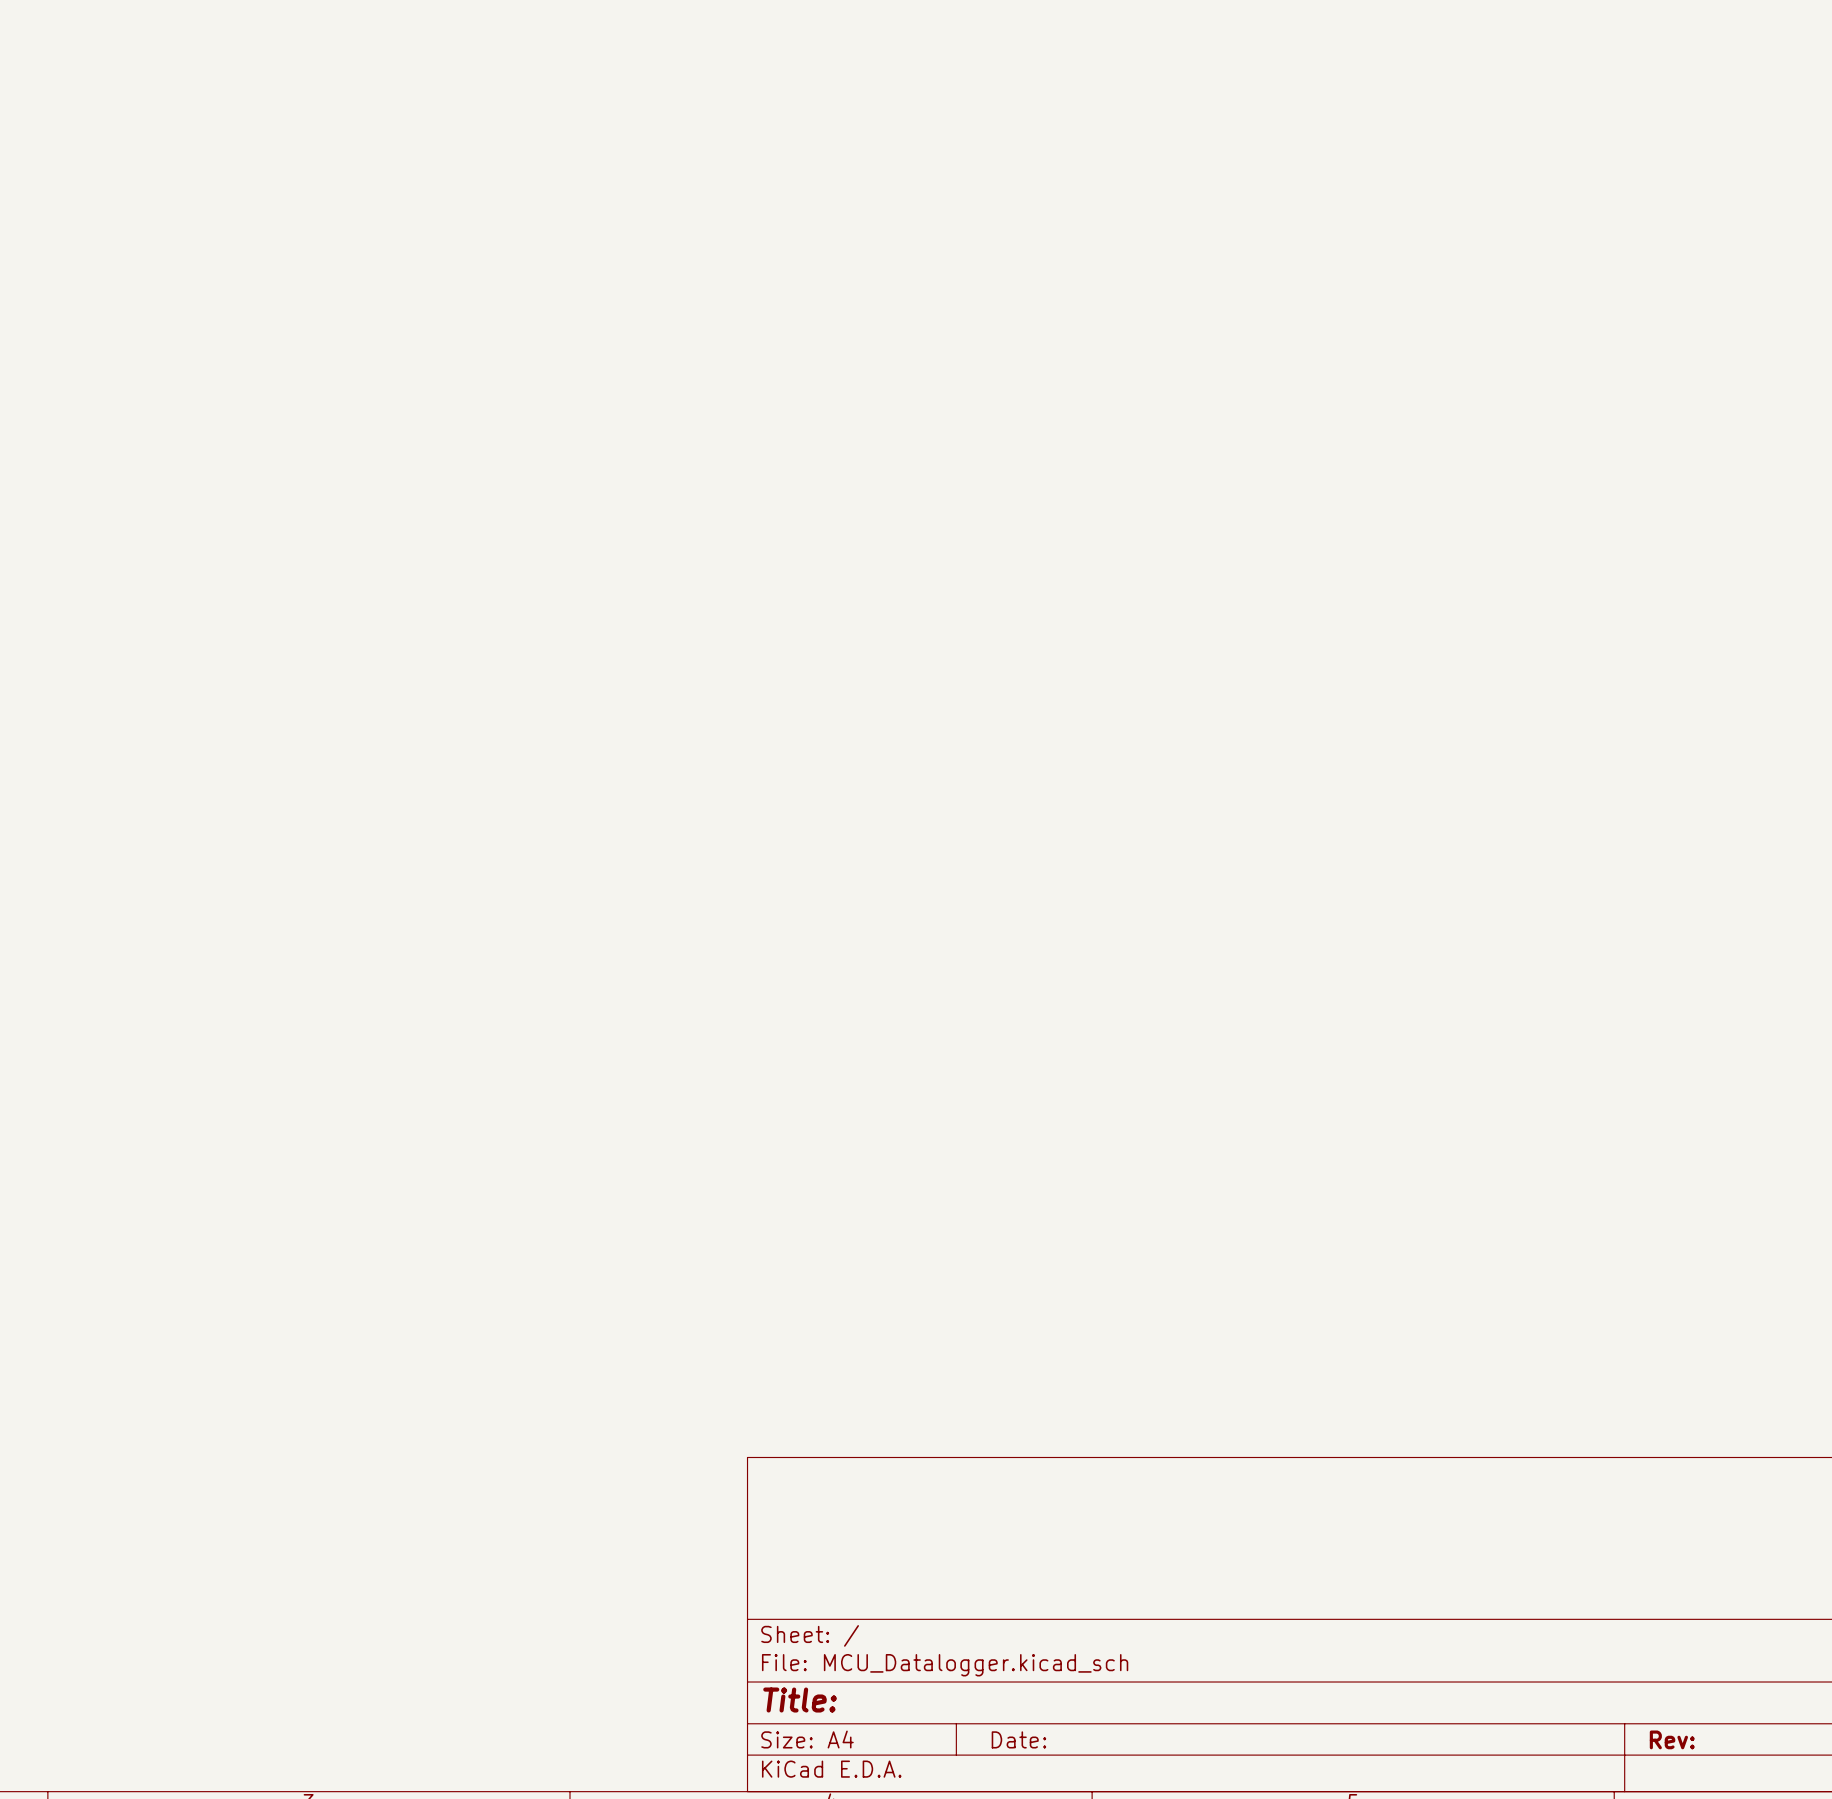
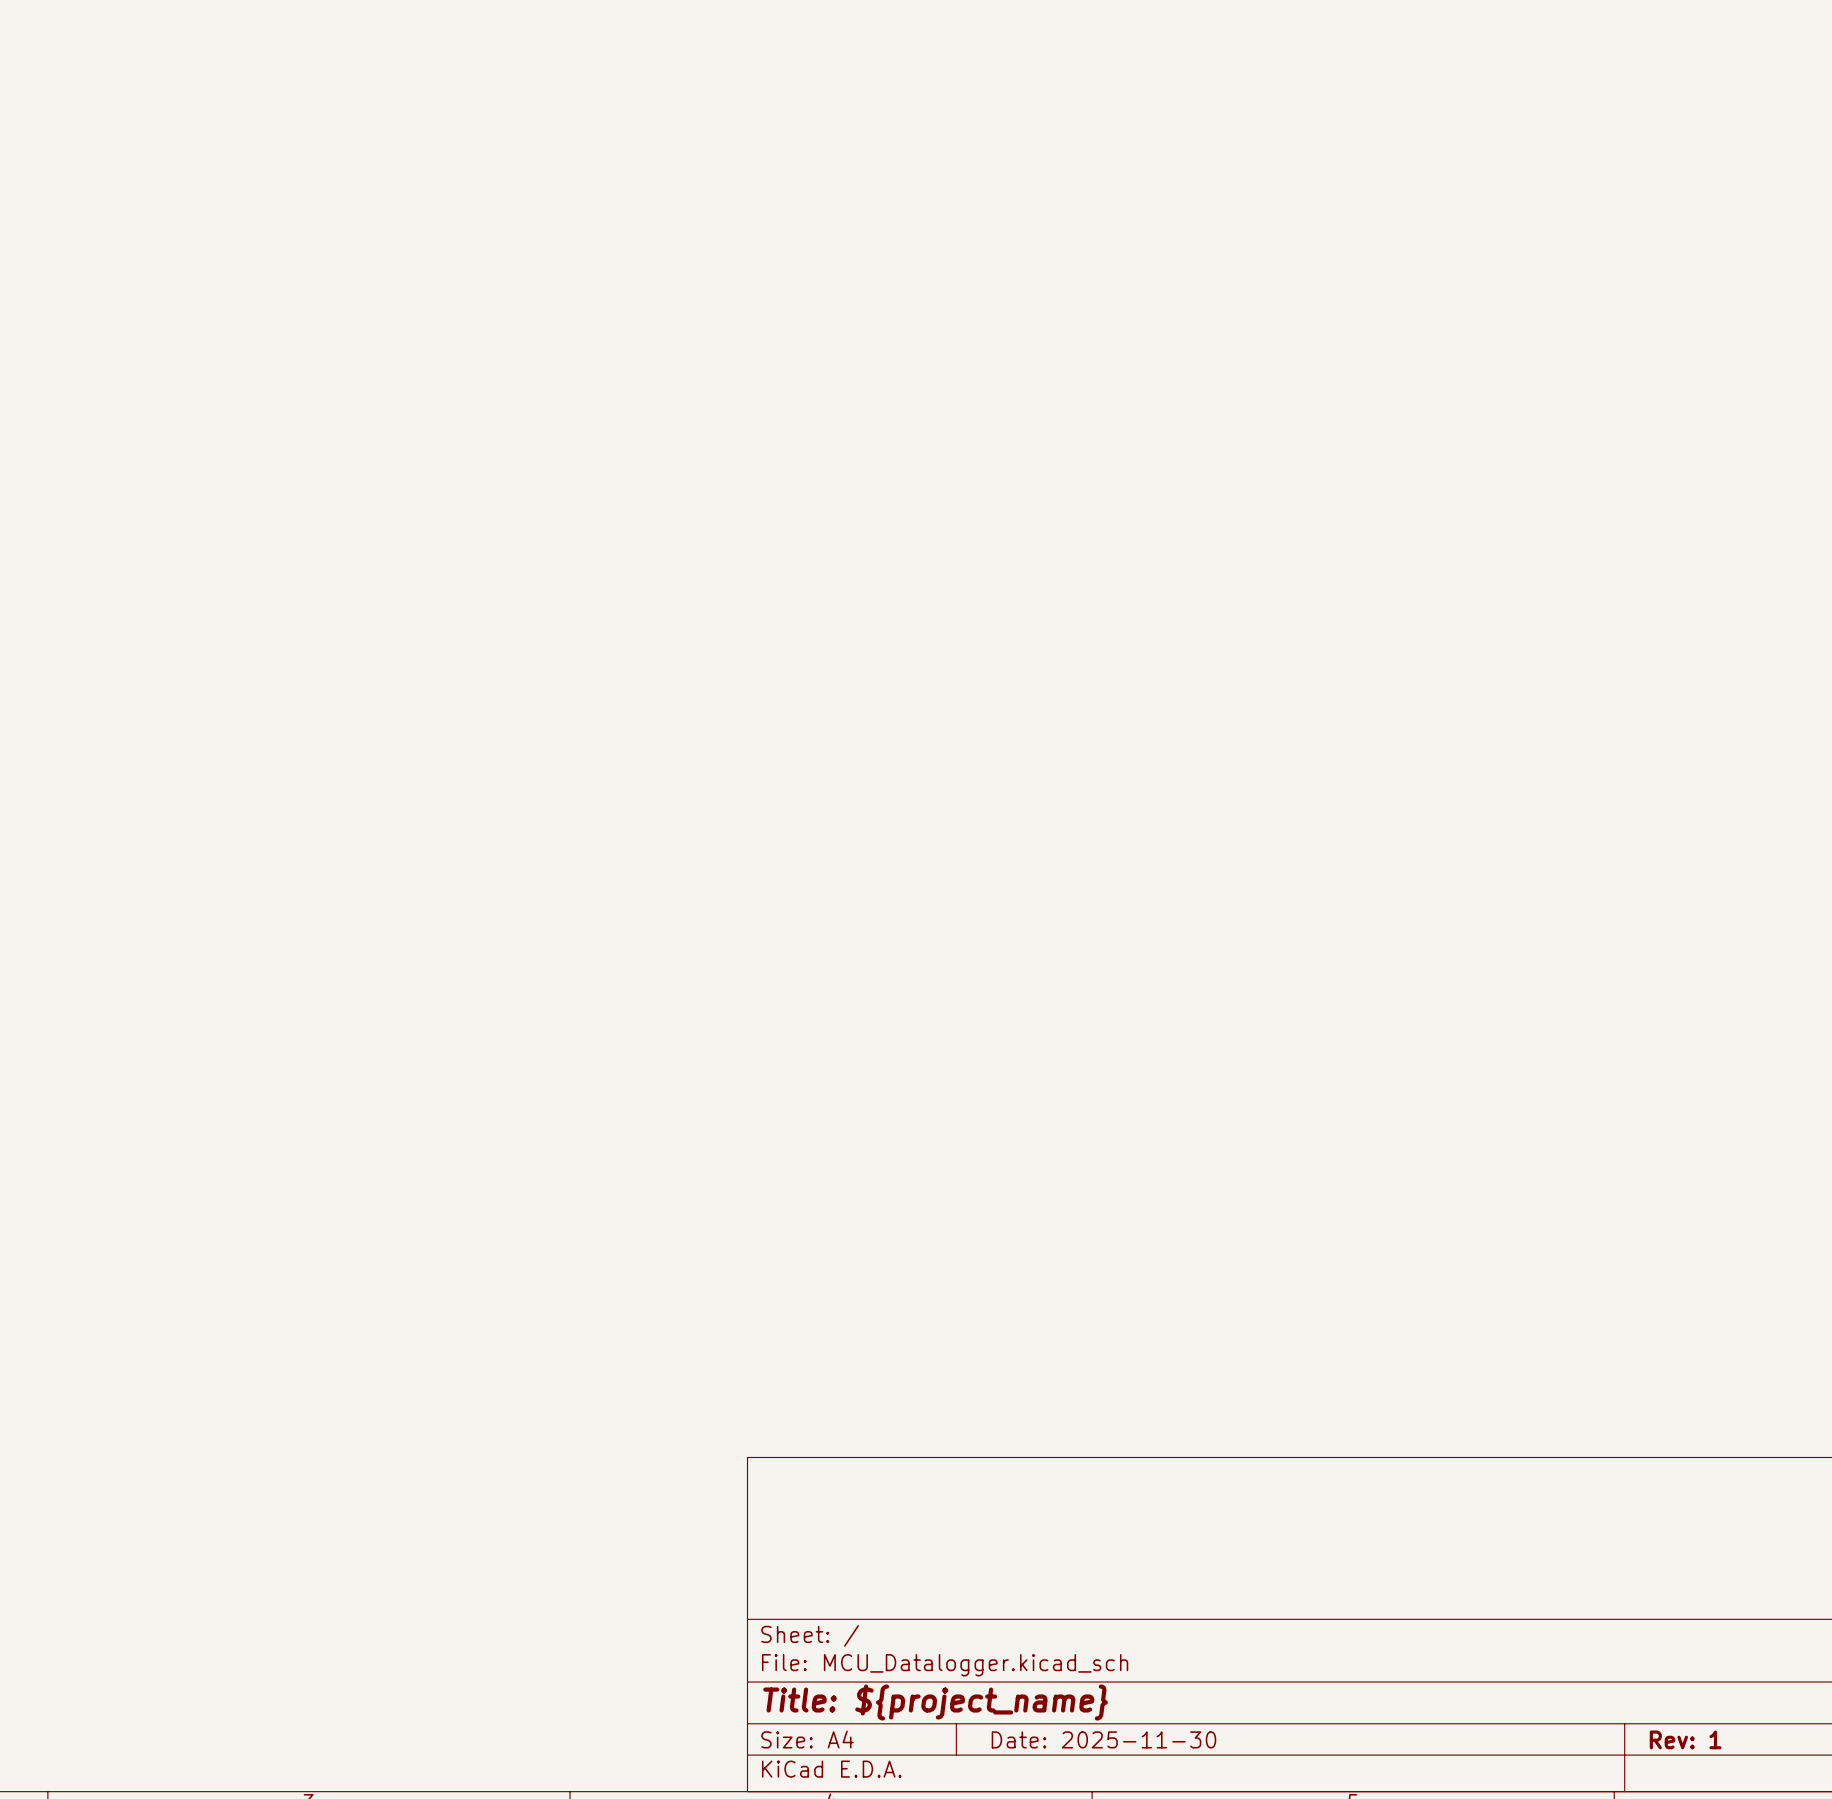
title block: Title: (800, 1700) -> Title: ${project_name} (935, 1702)
title block: Date: (1018, 1739) -> Date: 2025-11-30 (1103, 1739)
title block: Rev: (1672, 1739) -> Rev: 1 (1685, 1739)

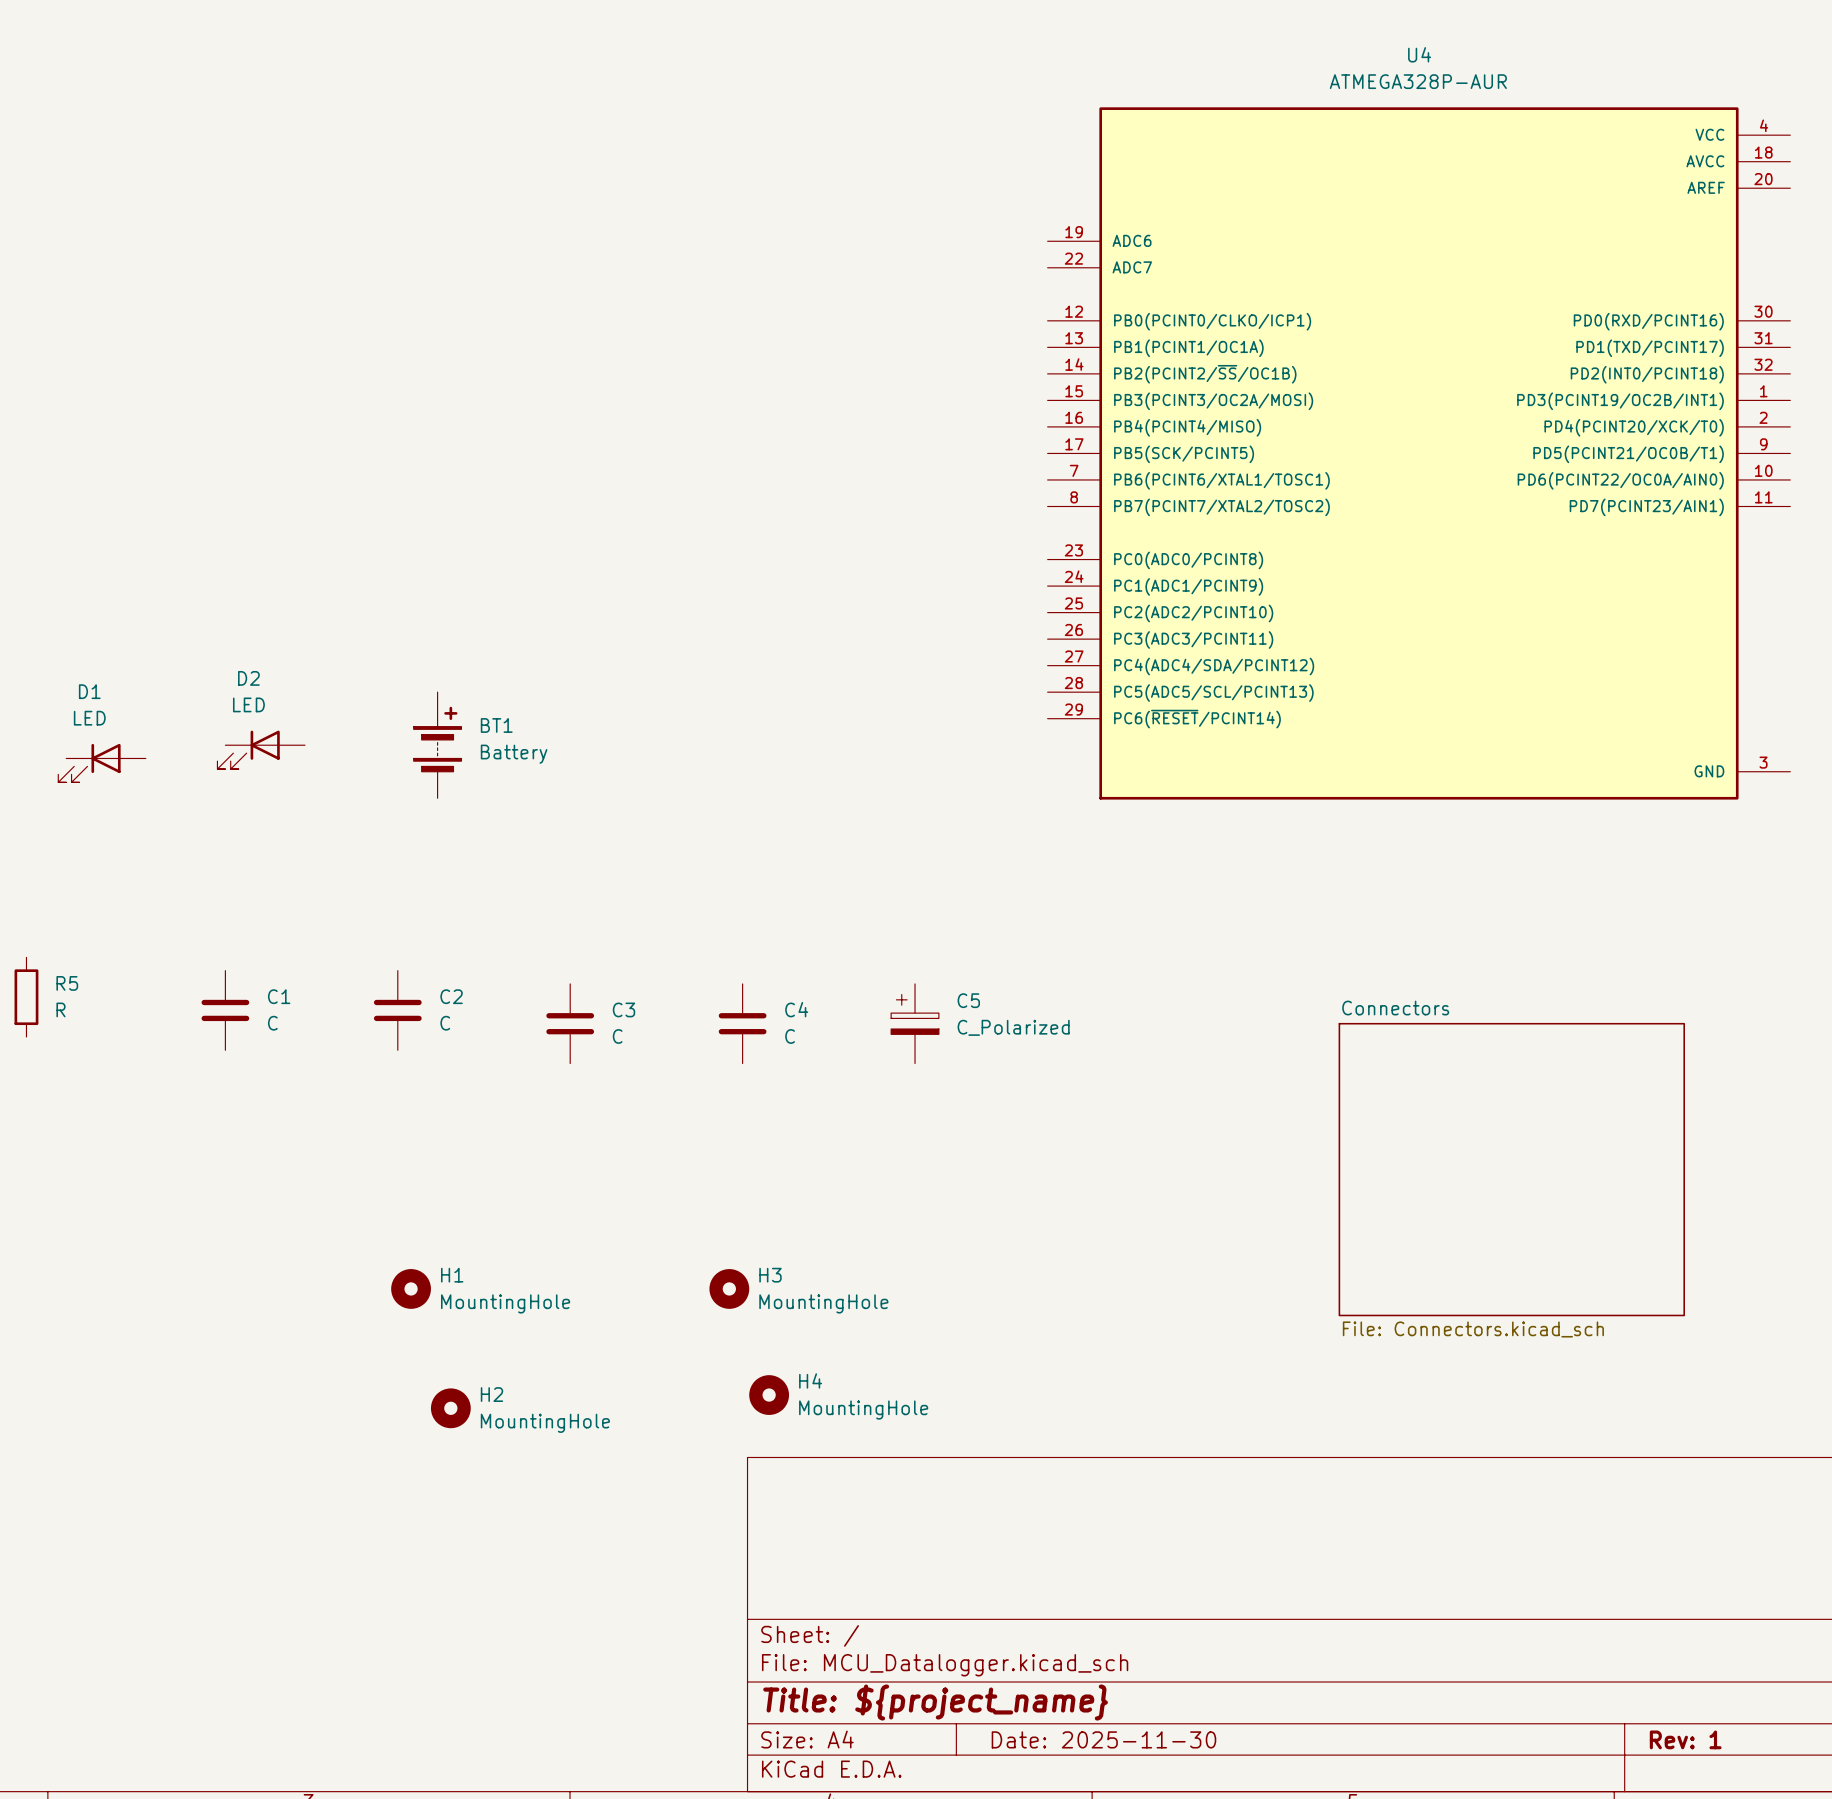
U4: none -> ATMEGA328P-AUR (1418, 453)
BT1: none -> Battery (437, 745)
D2: none -> LED (261, 749)
D1: none -> LED (102, 763)
R5: none -> R (26, 997)
C1: none -> C (225, 1010)
C2: none -> C (397, 1010)
C3: none -> C (570, 1023)
C4: none -> C (742, 1023)
C5: none -> C_Polarized (915, 1023)
sheet Connectors: none -> File: Connectors.kicad_sch (1511, 1169)
H1: none -> MountingHole (411, 1288)
H3: none -> MountingHole (729, 1288)
H4: none -> MountingHole (769, 1395)
H2: none -> MountingHole (450, 1408)

